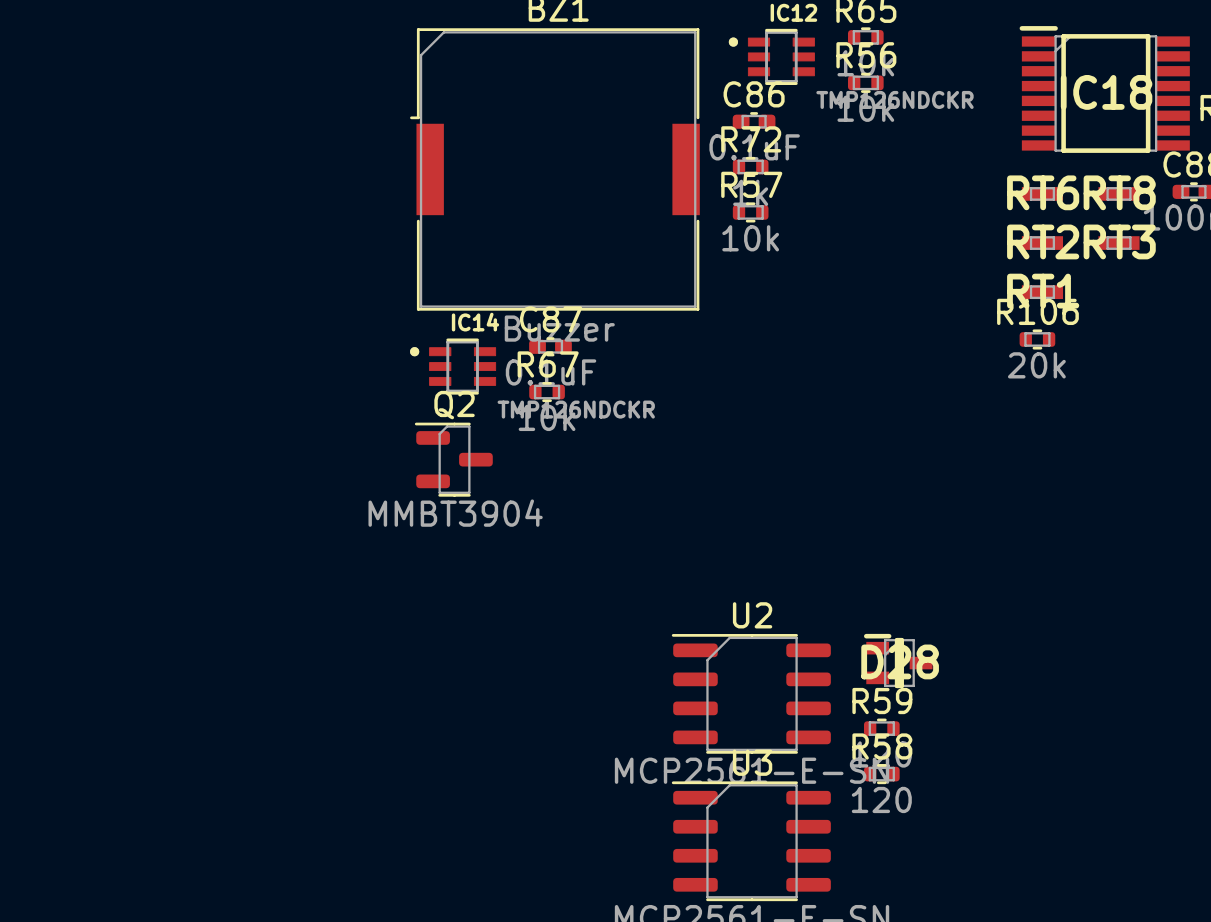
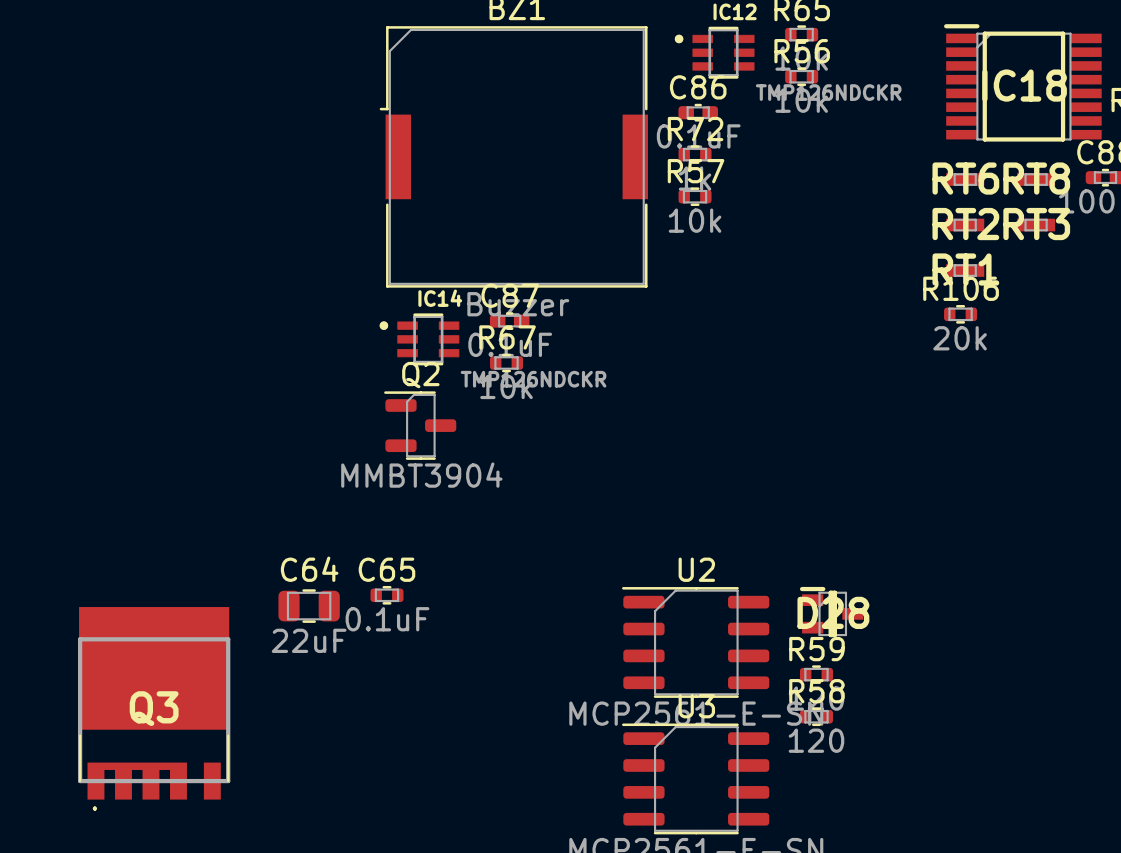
C65: none -> 0.1uF (386, 595)
C64: none -> 22uF (309, 606)
Q3: none -> (154, 708)

